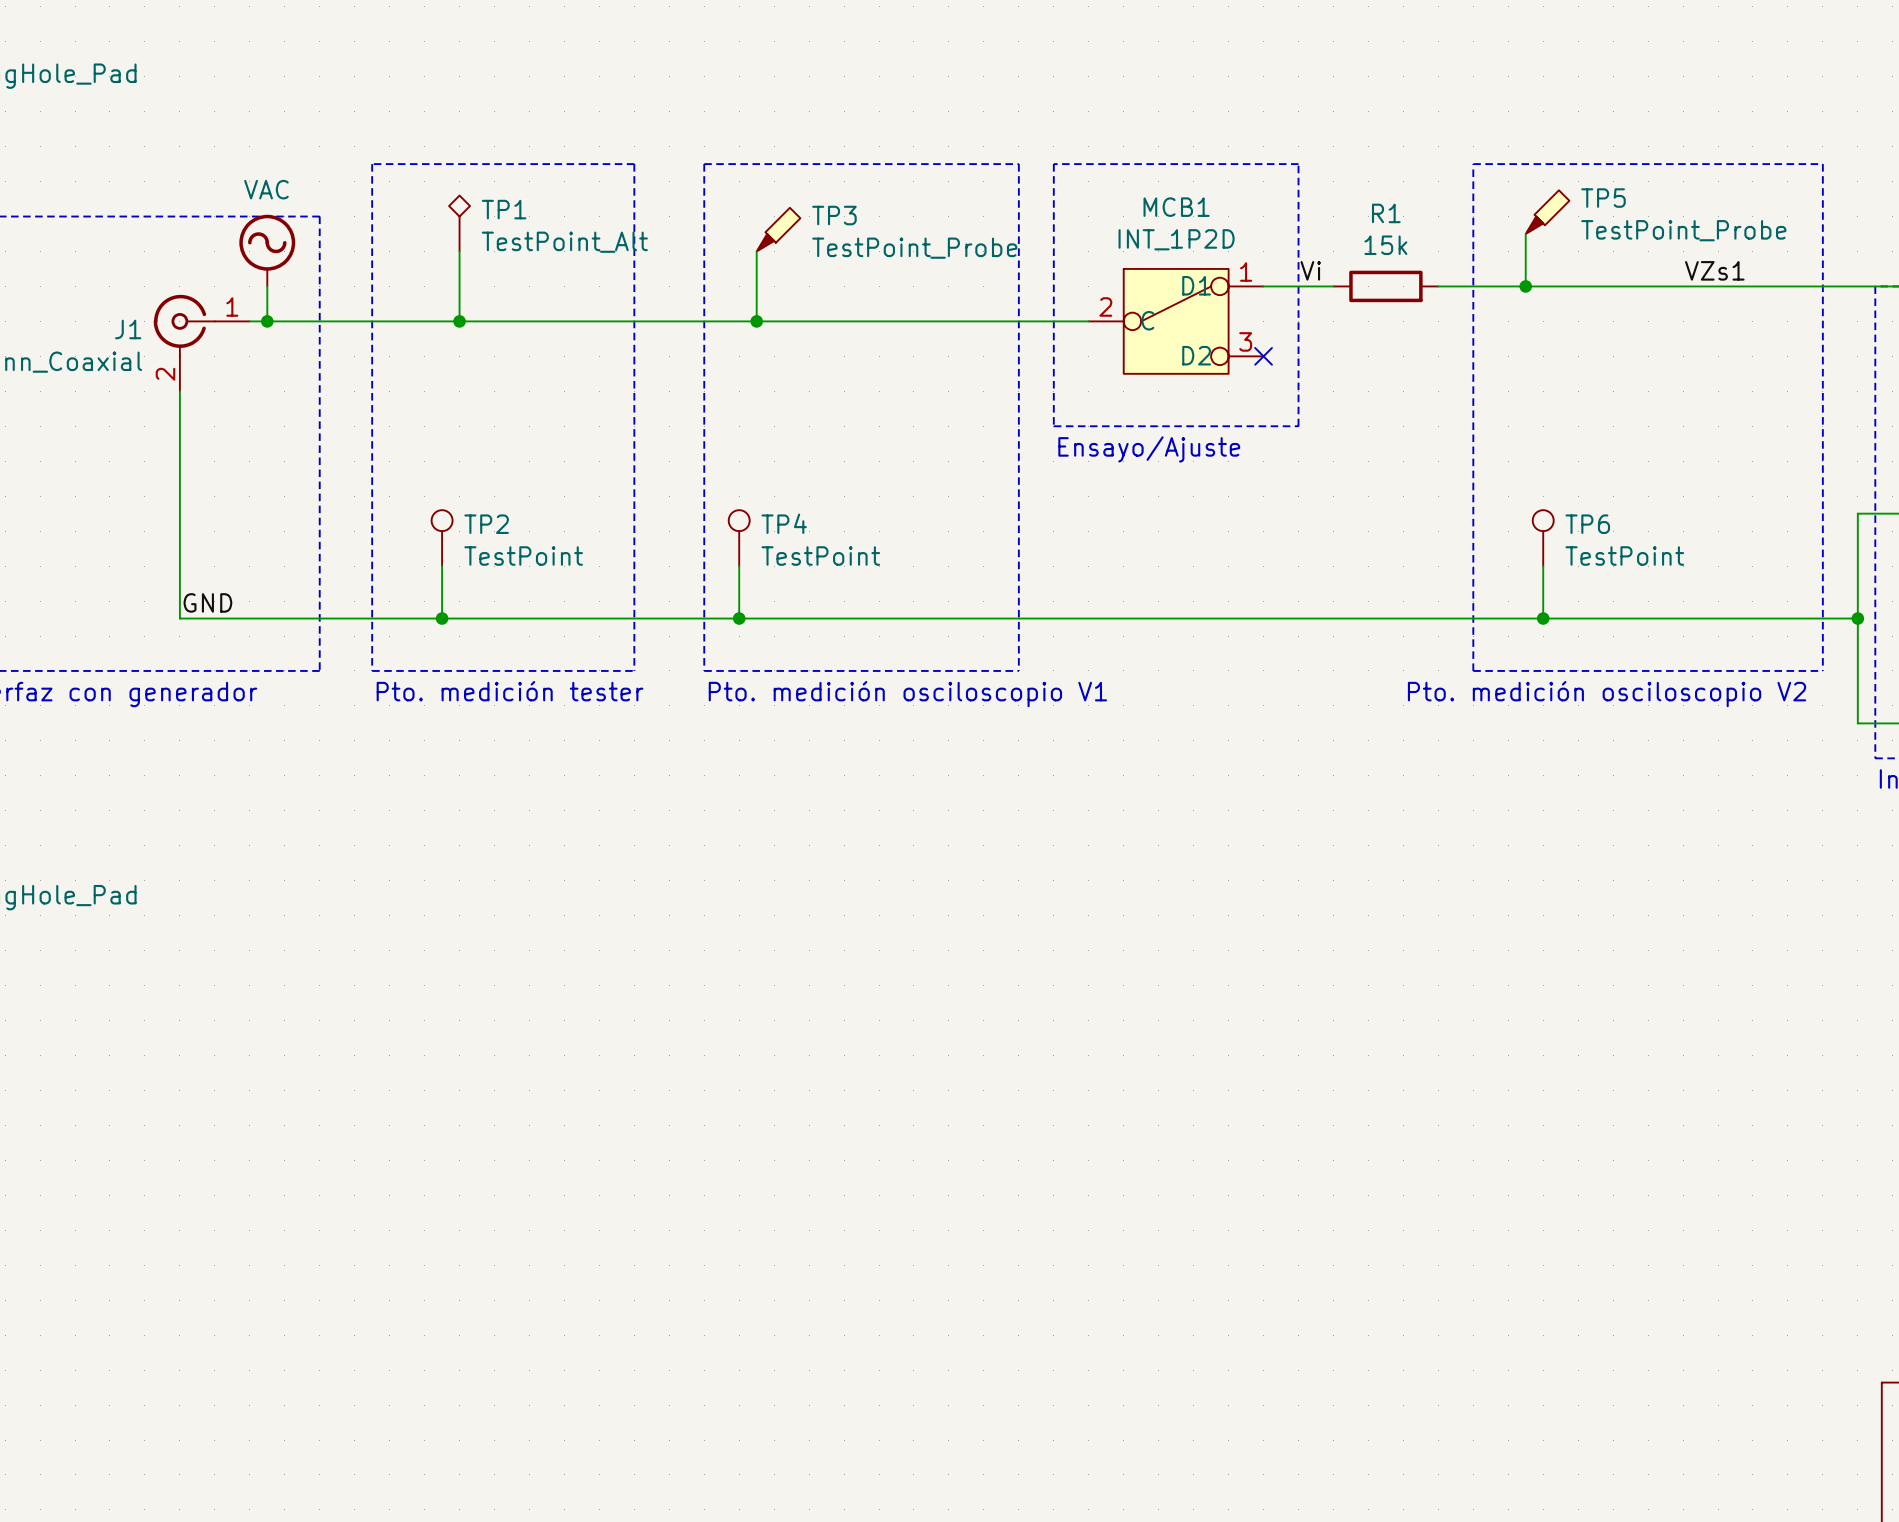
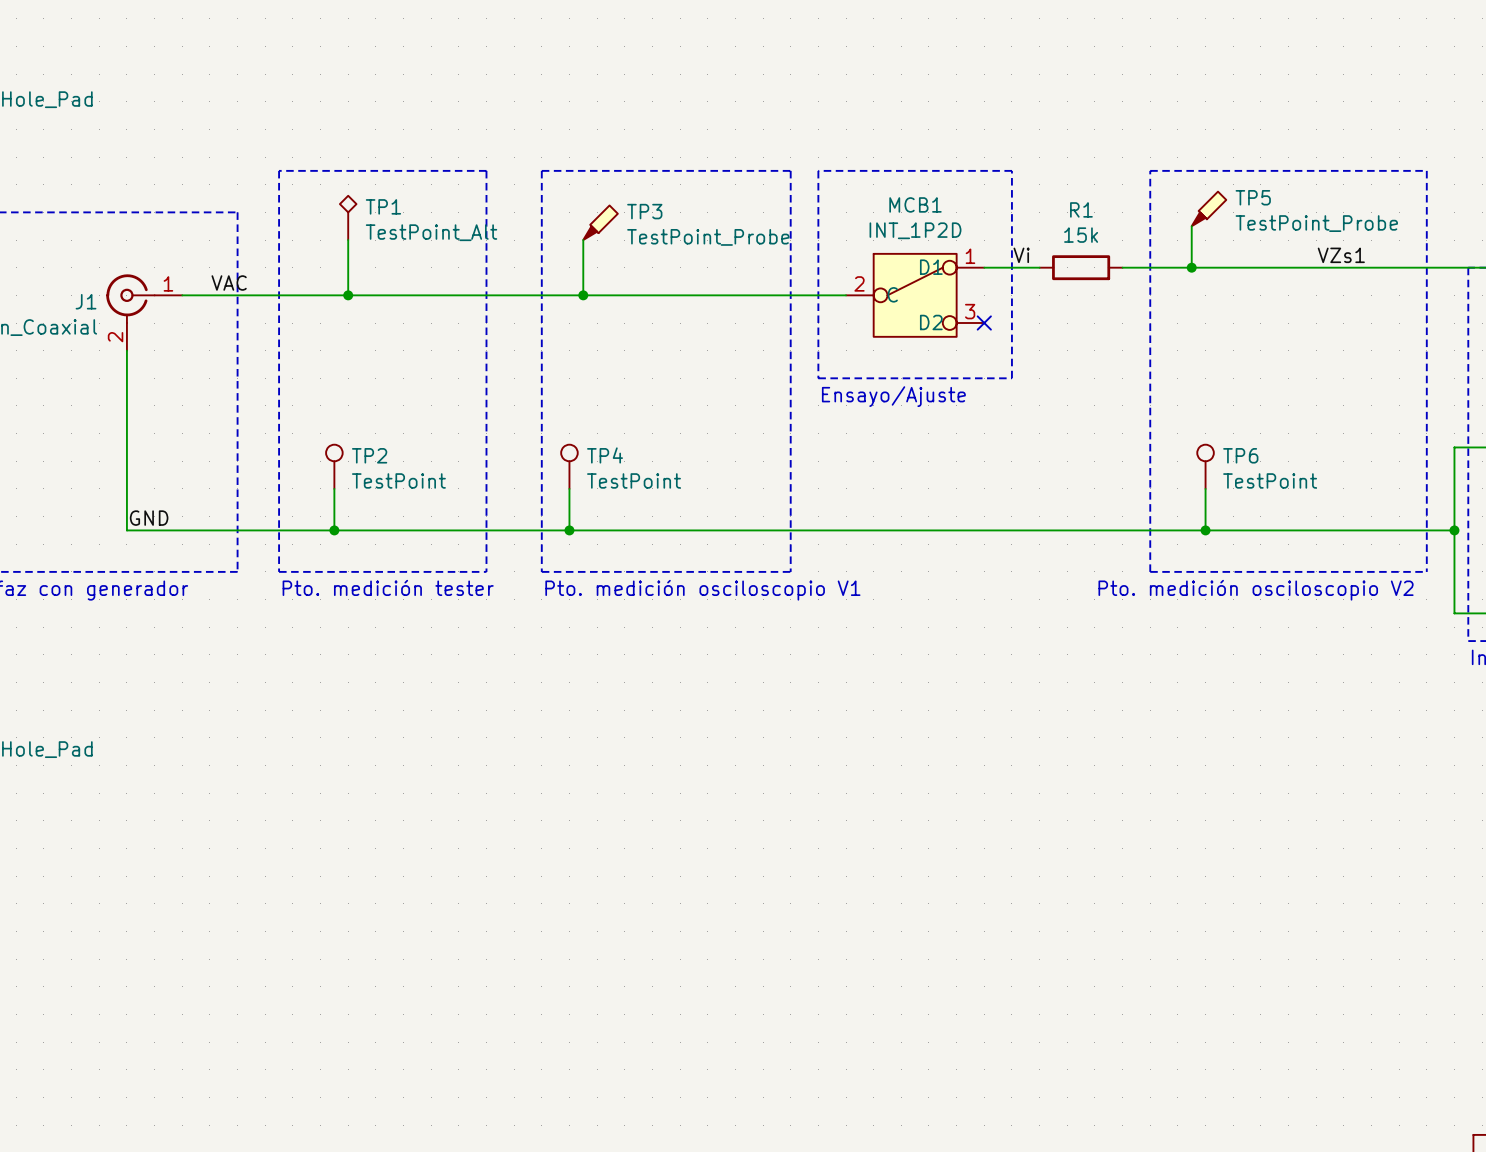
power symbol: VAC (267, 250) -> none
wire: (267, 286) (267, 321) -> none
label: none -> VAC (229, 283)
junction: (267, 321) -> none

